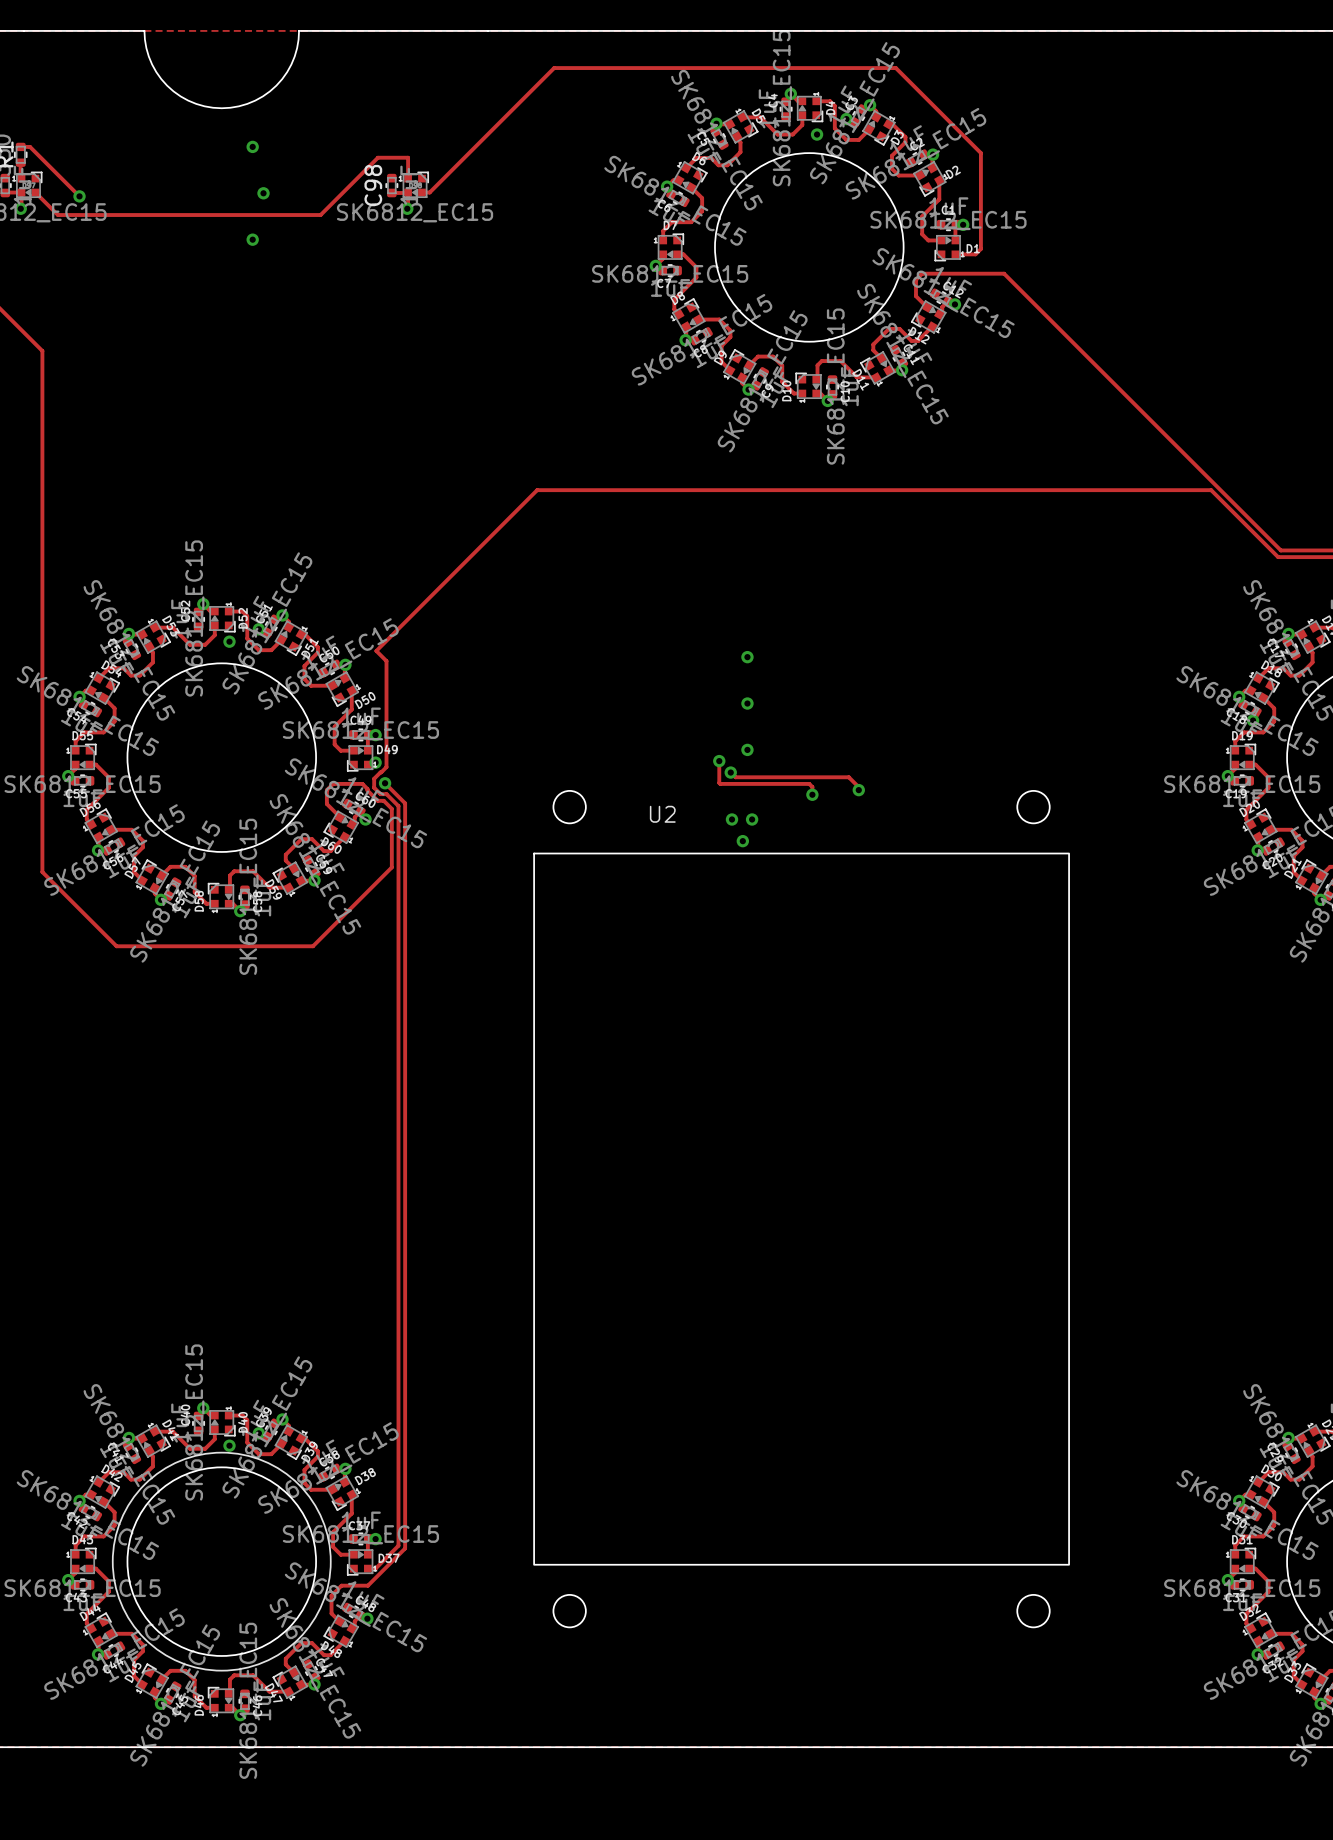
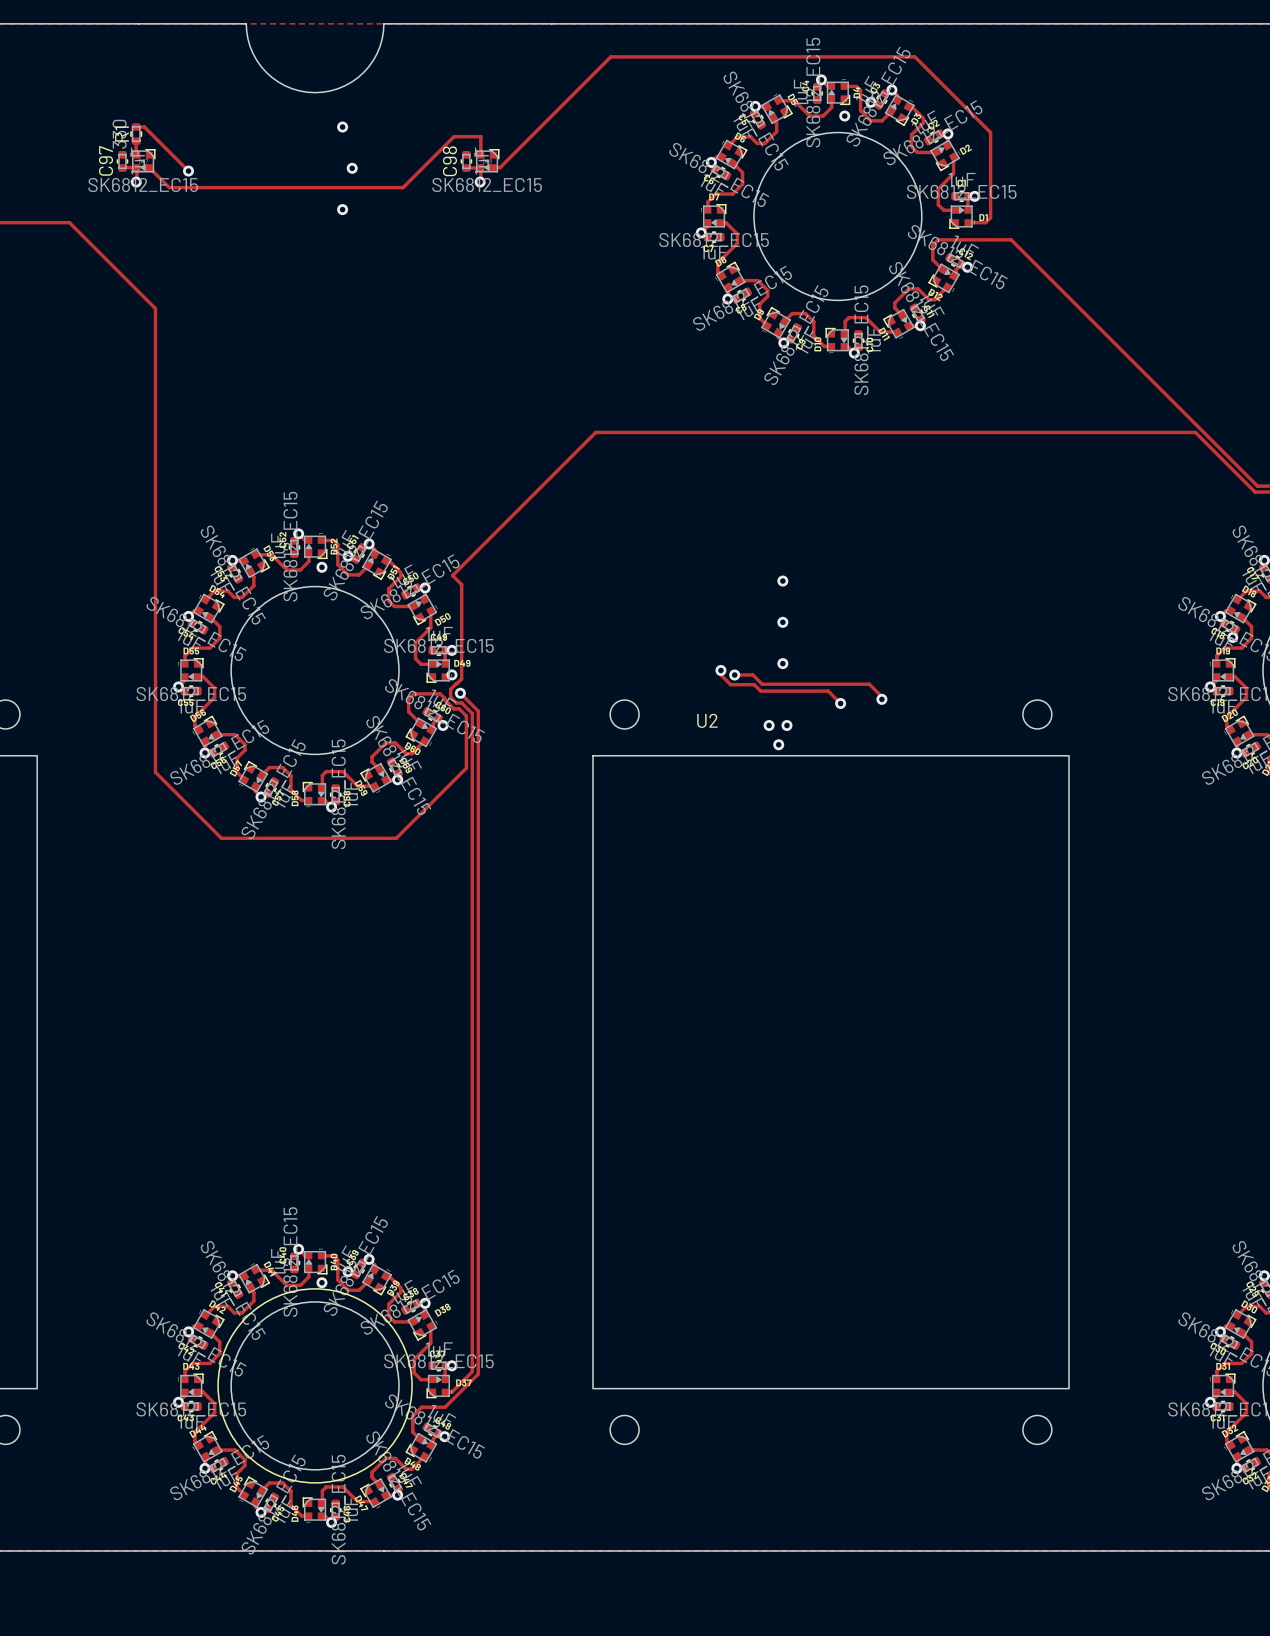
via: none -> (720, 670)
track: (719, 761) (720, 783) (809, 783) (812, 787) (812, 794) -> (720, 670) (720, 674) (730, 684) (754, 684) (760, 691) (828, 691) (840, 703)
via: (719, 761) -> none
via: none -> (734, 675)
track: (730, 772) (735, 777) (848, 777) -> (734, 675) (752, 675) (762, 684) (869, 684) (873, 687)
via: (730, 772) -> none

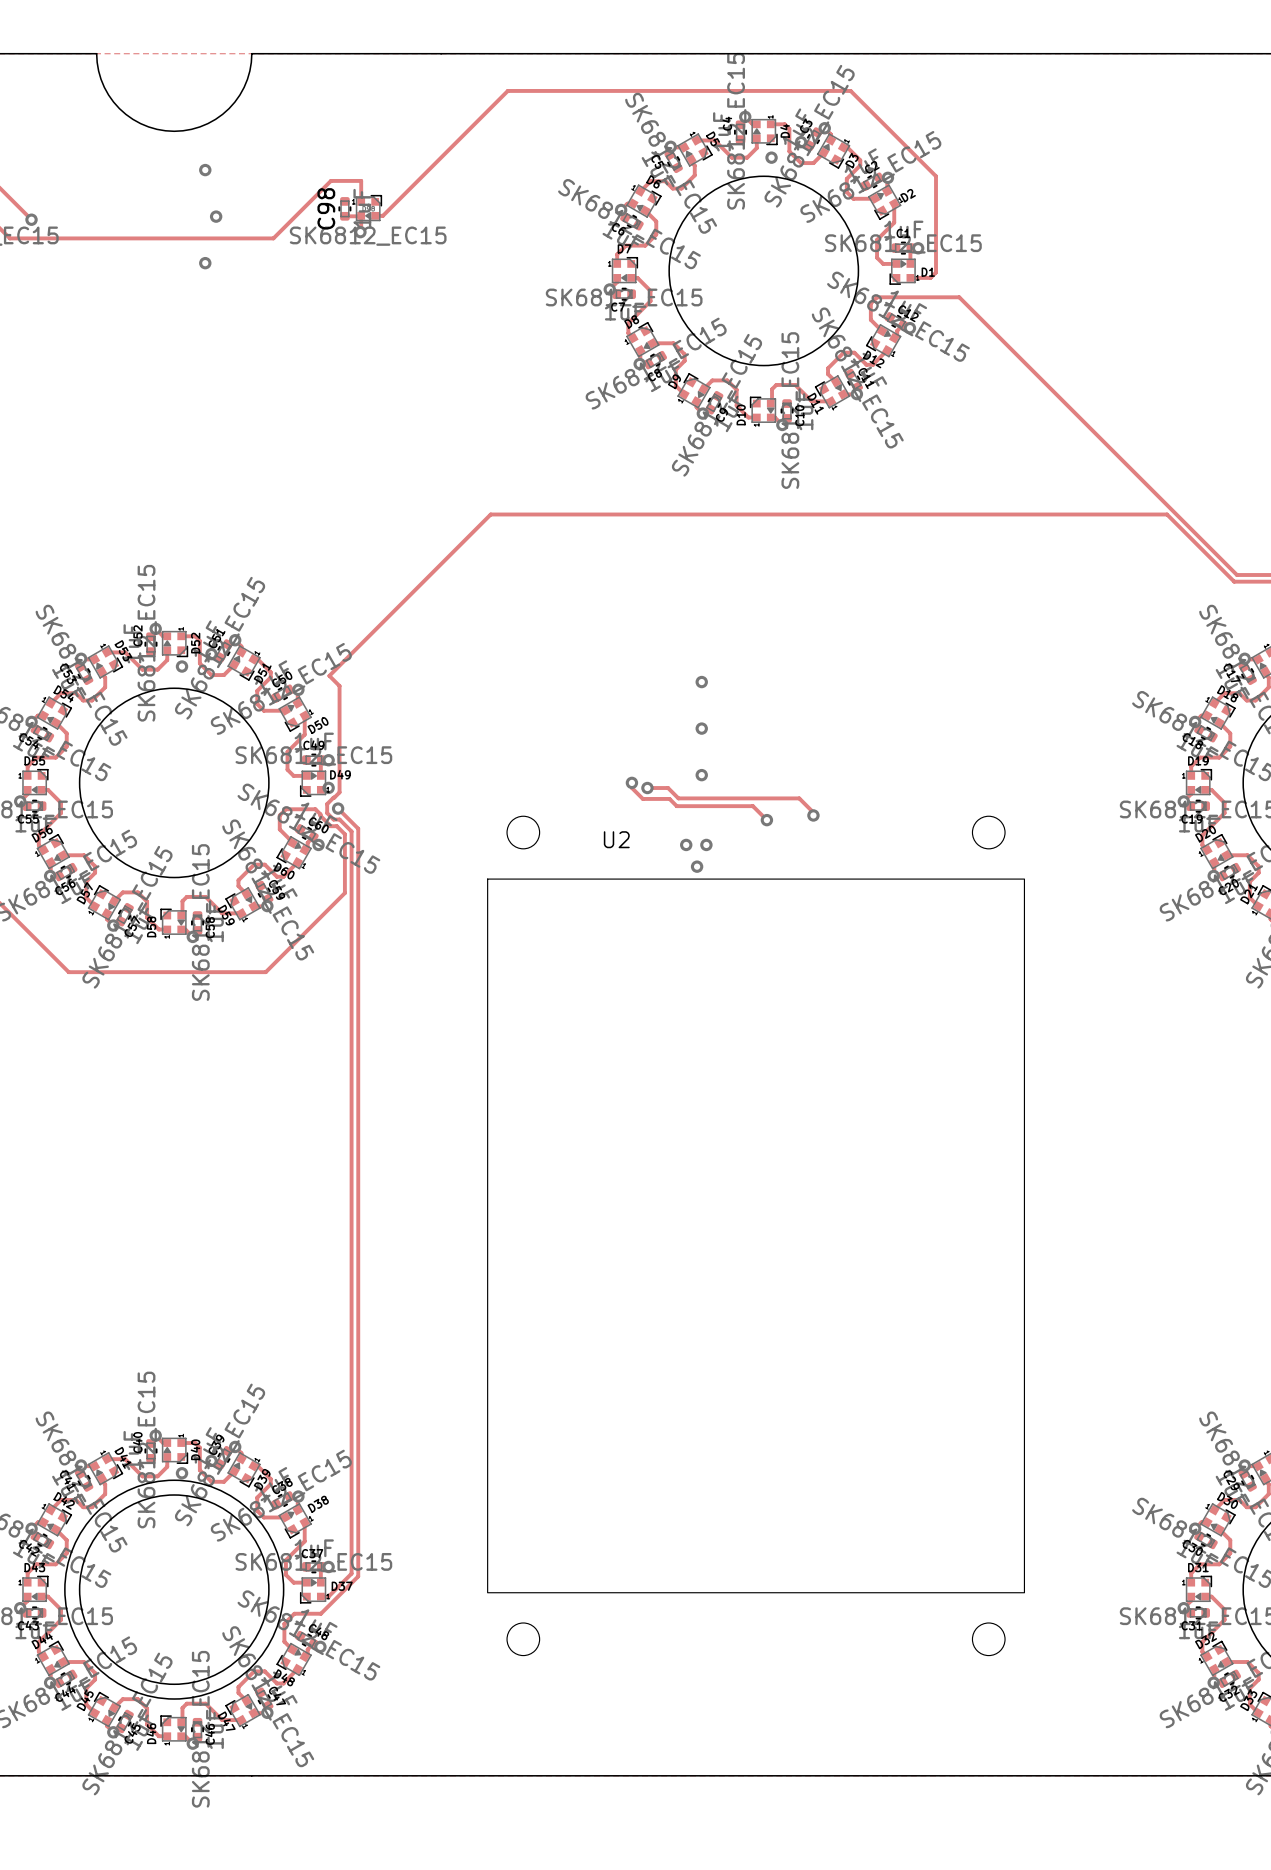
via: (1232, 637) -> none

